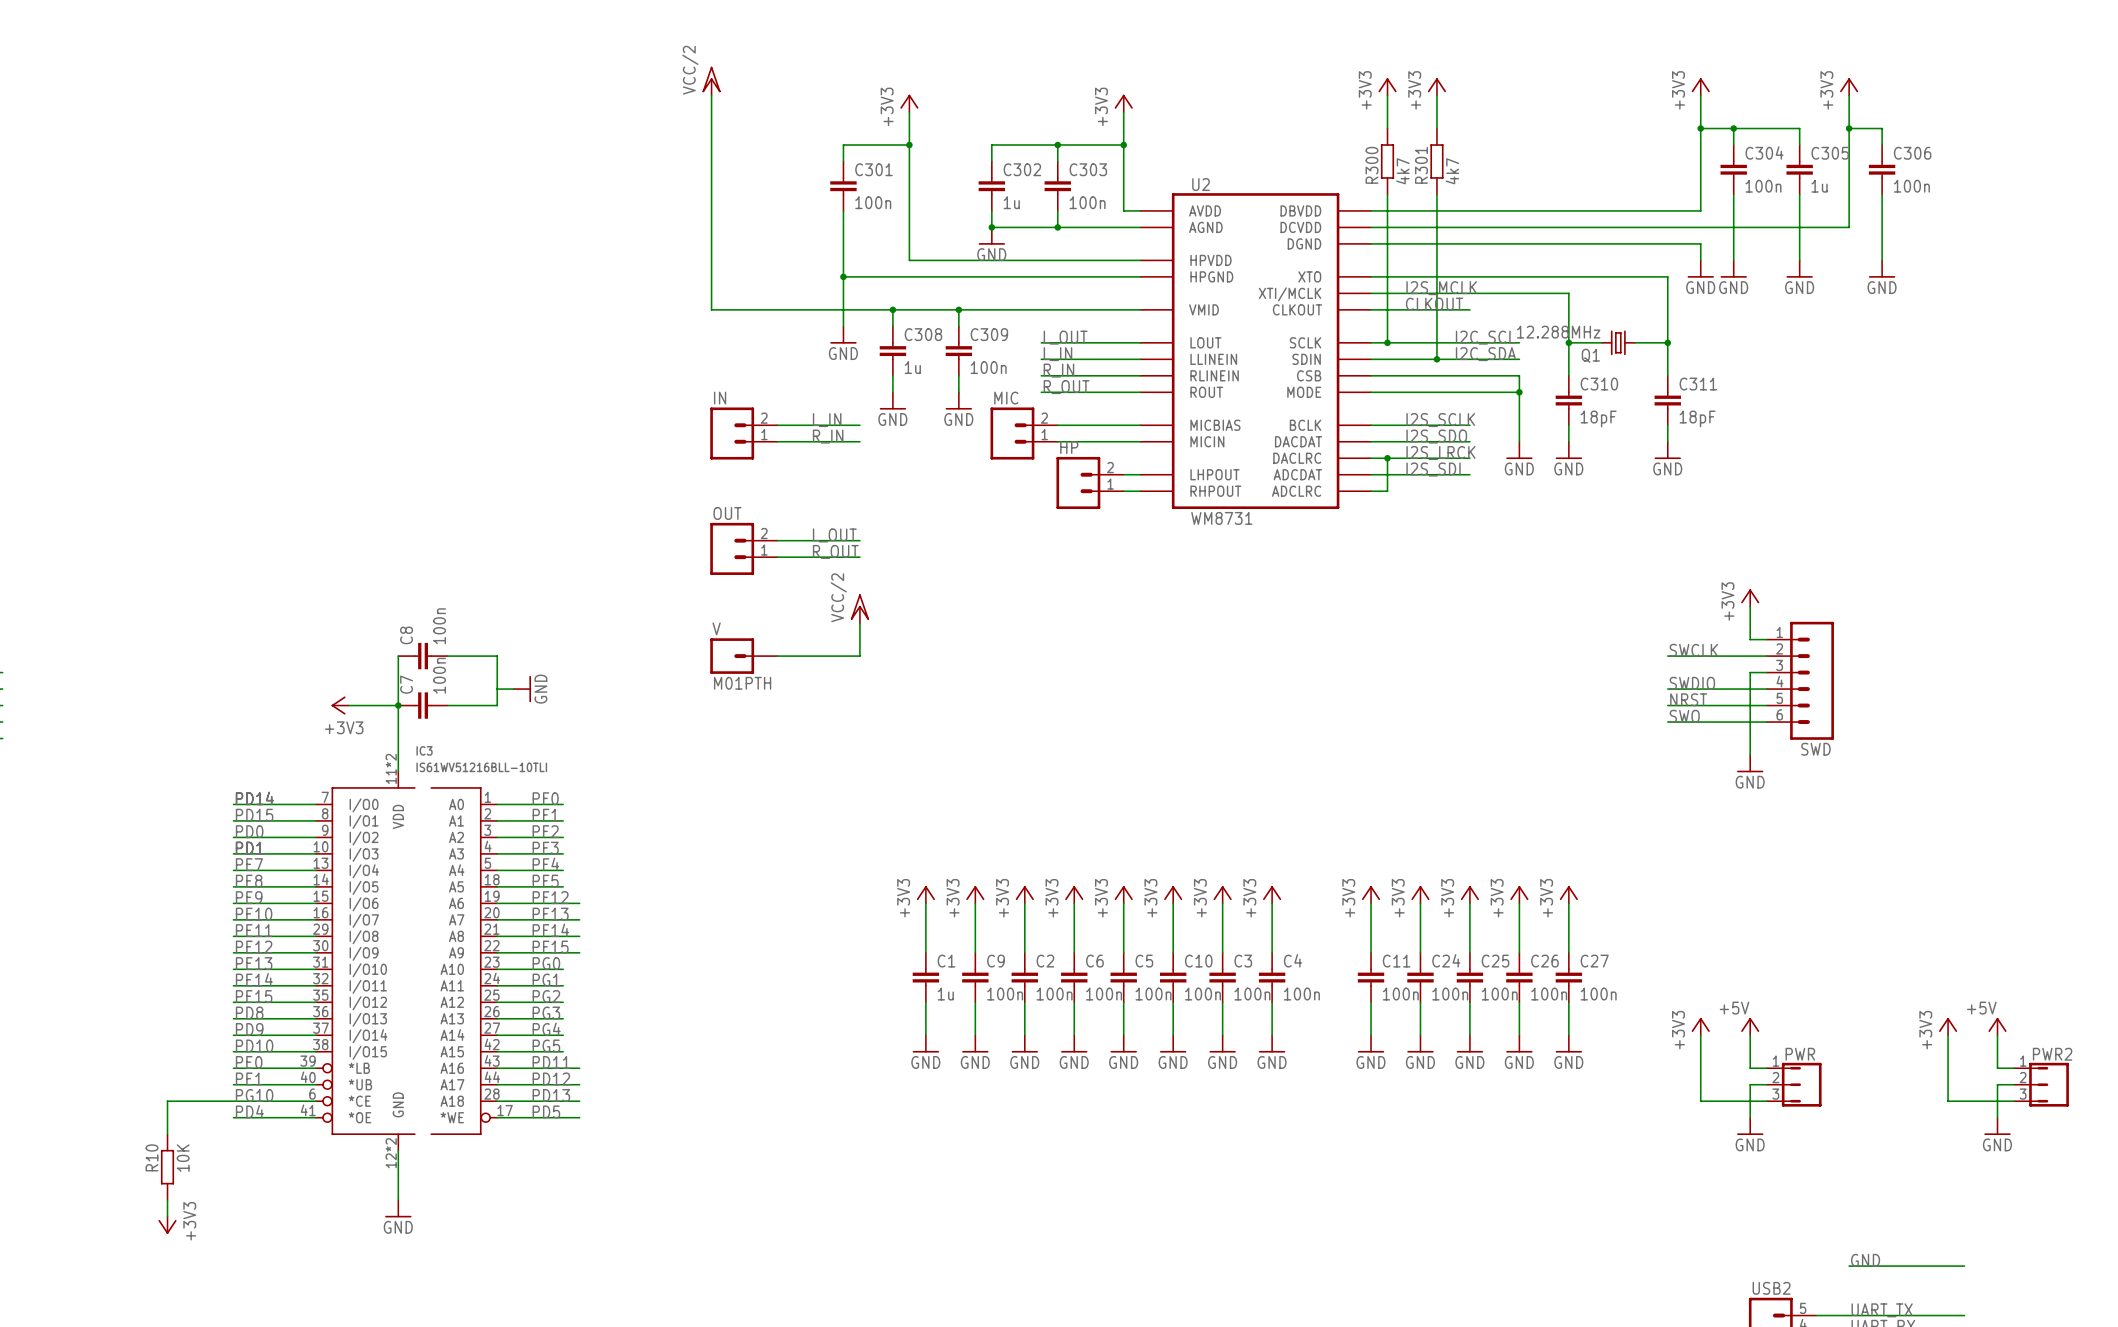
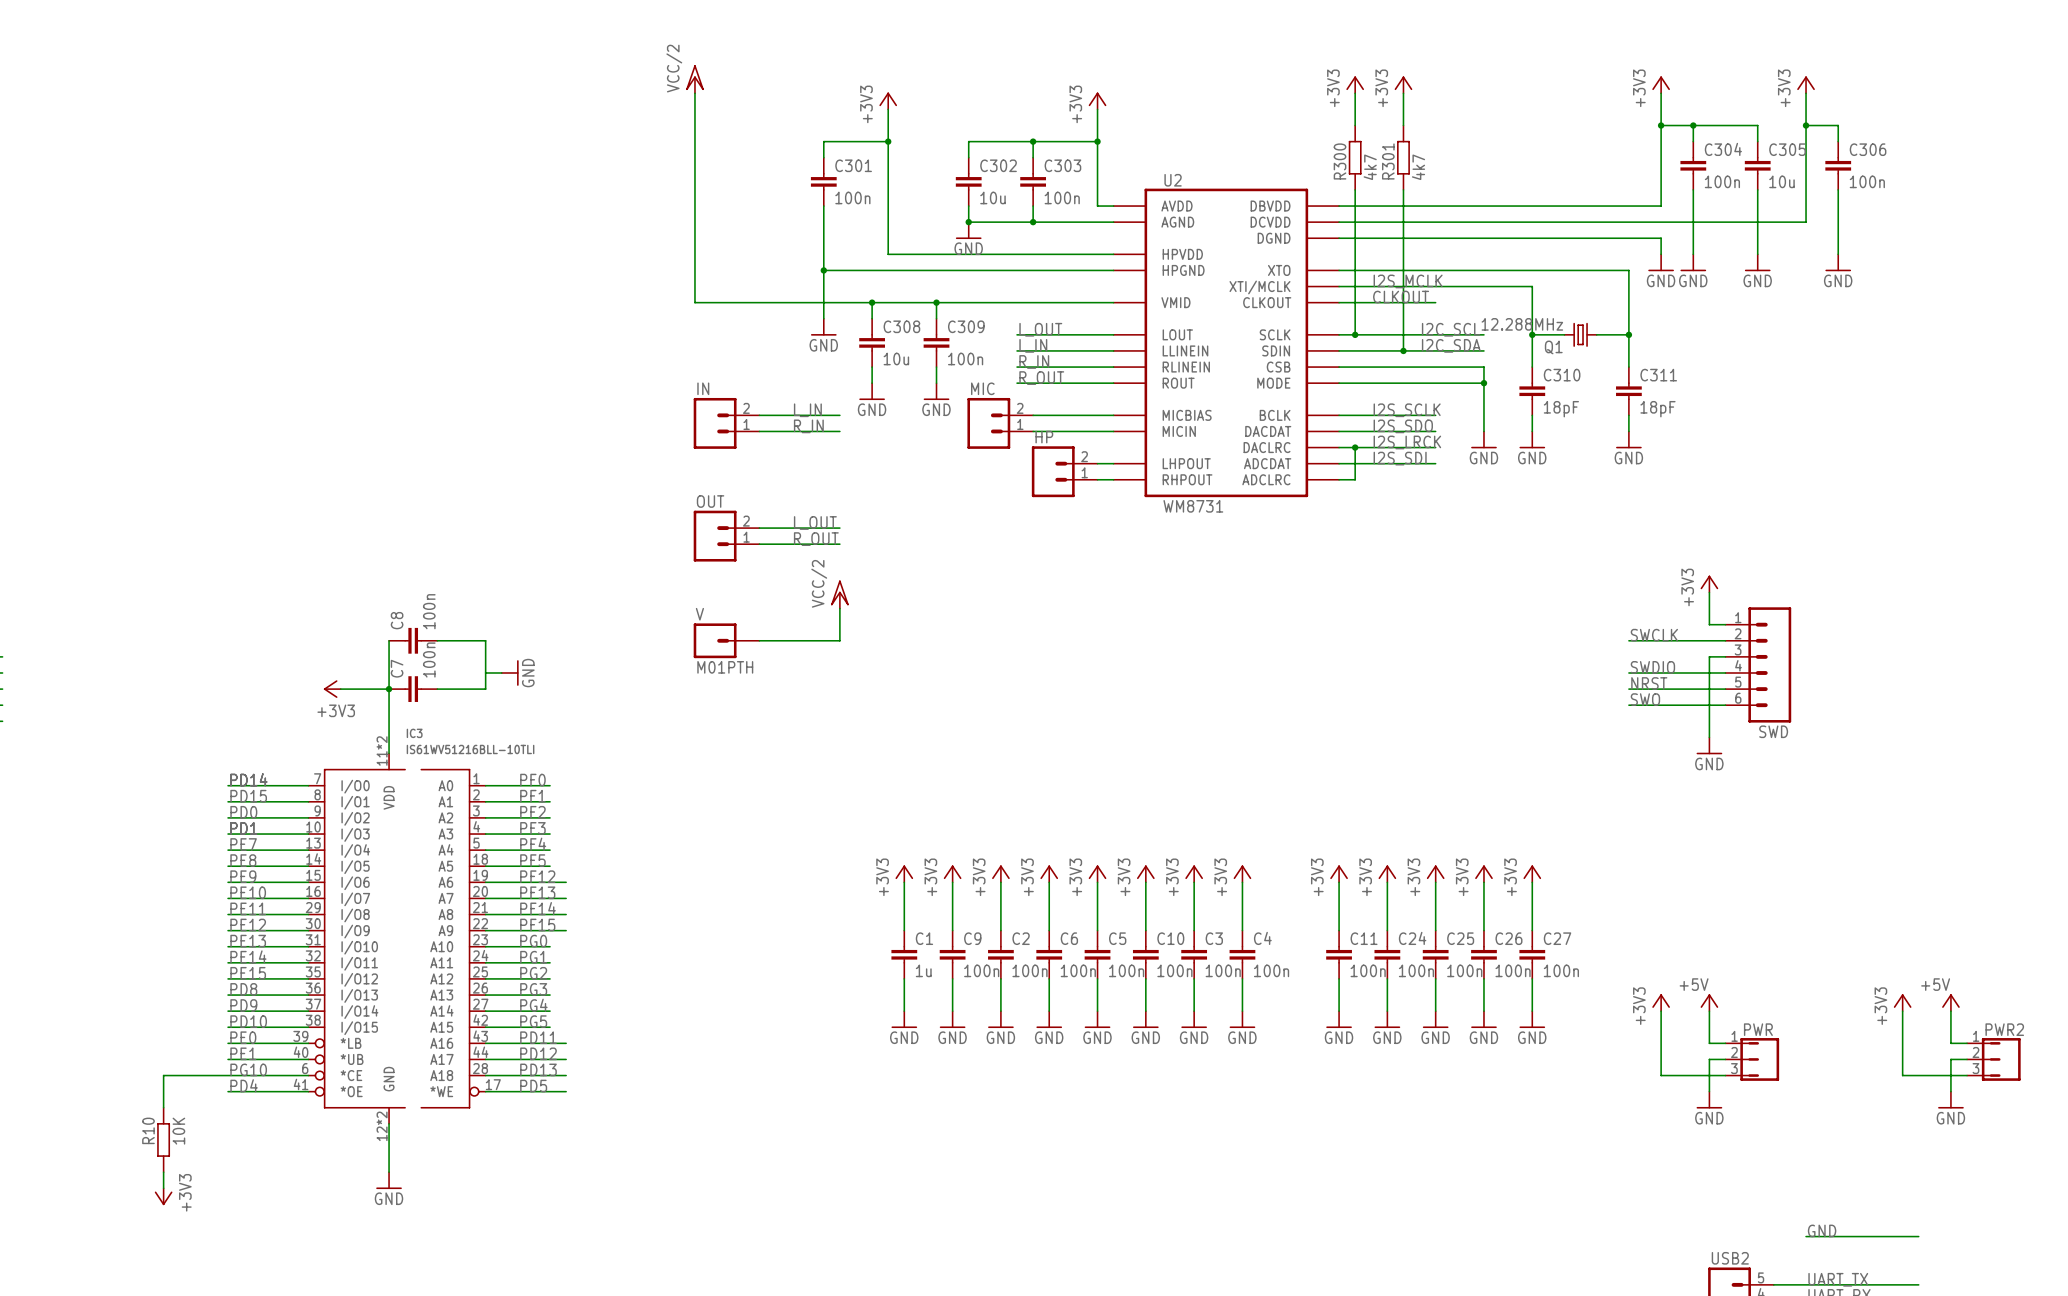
C305 value: 1u (1819, 186) -> 10u (1781, 181)
C302 value: 1u (1011, 202) -> 10u (992, 197)
C308 value: 1u (912, 367) -> 10u (896, 359)

